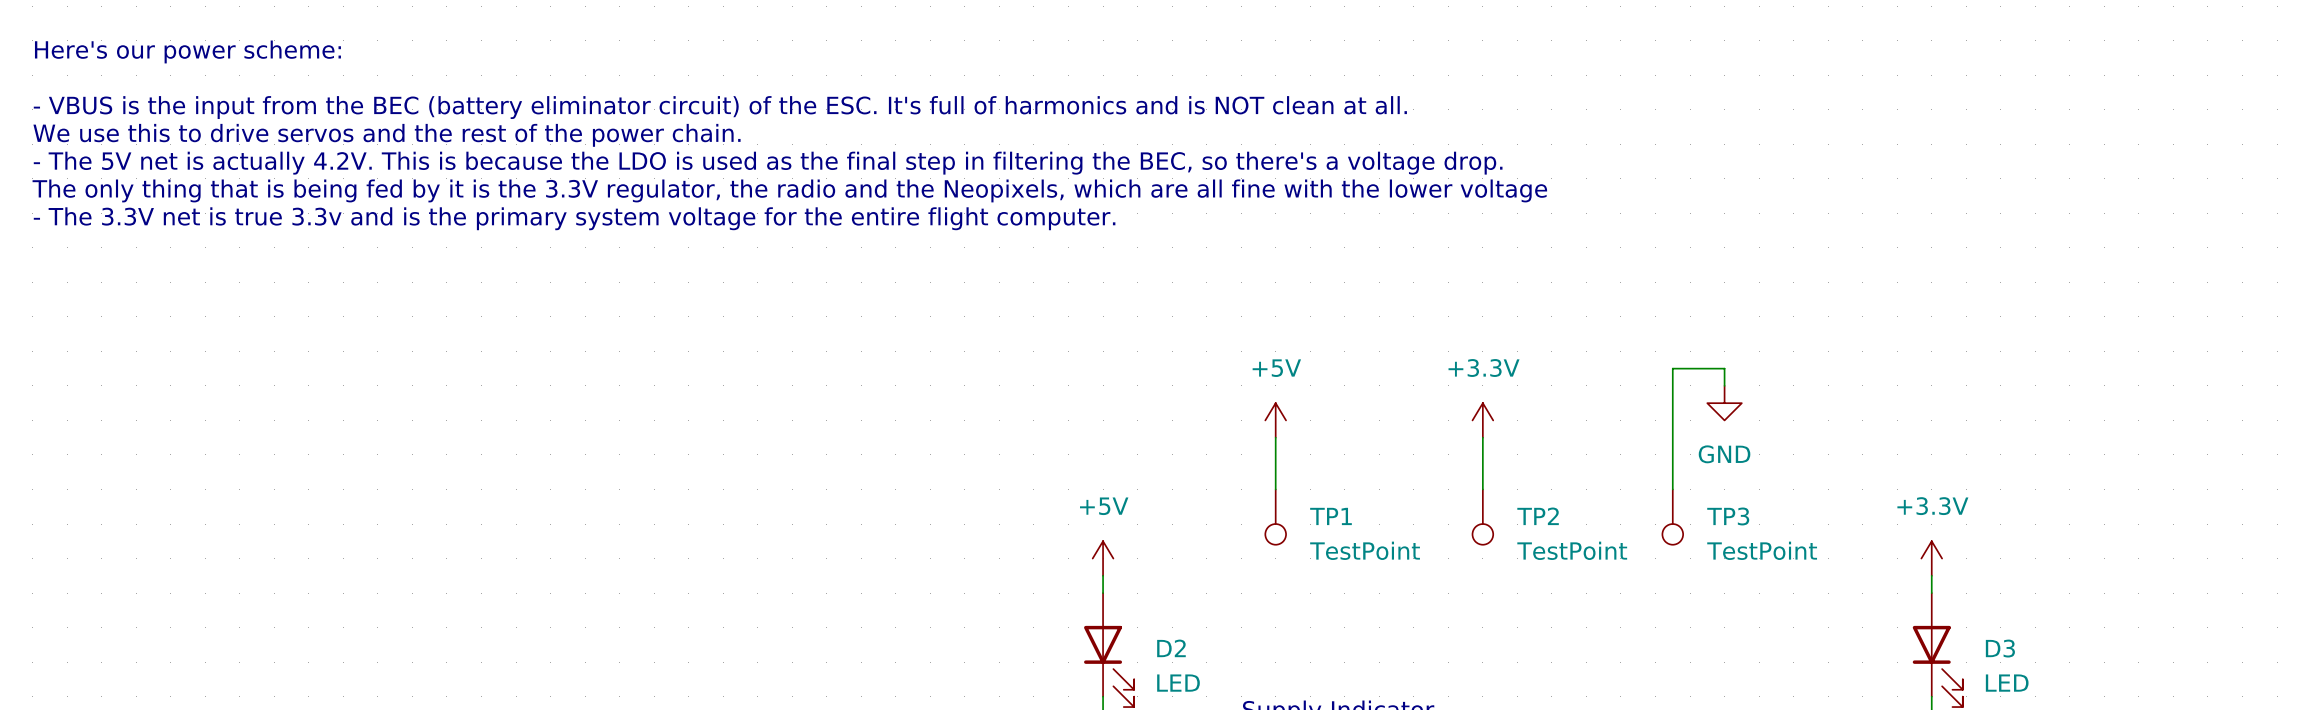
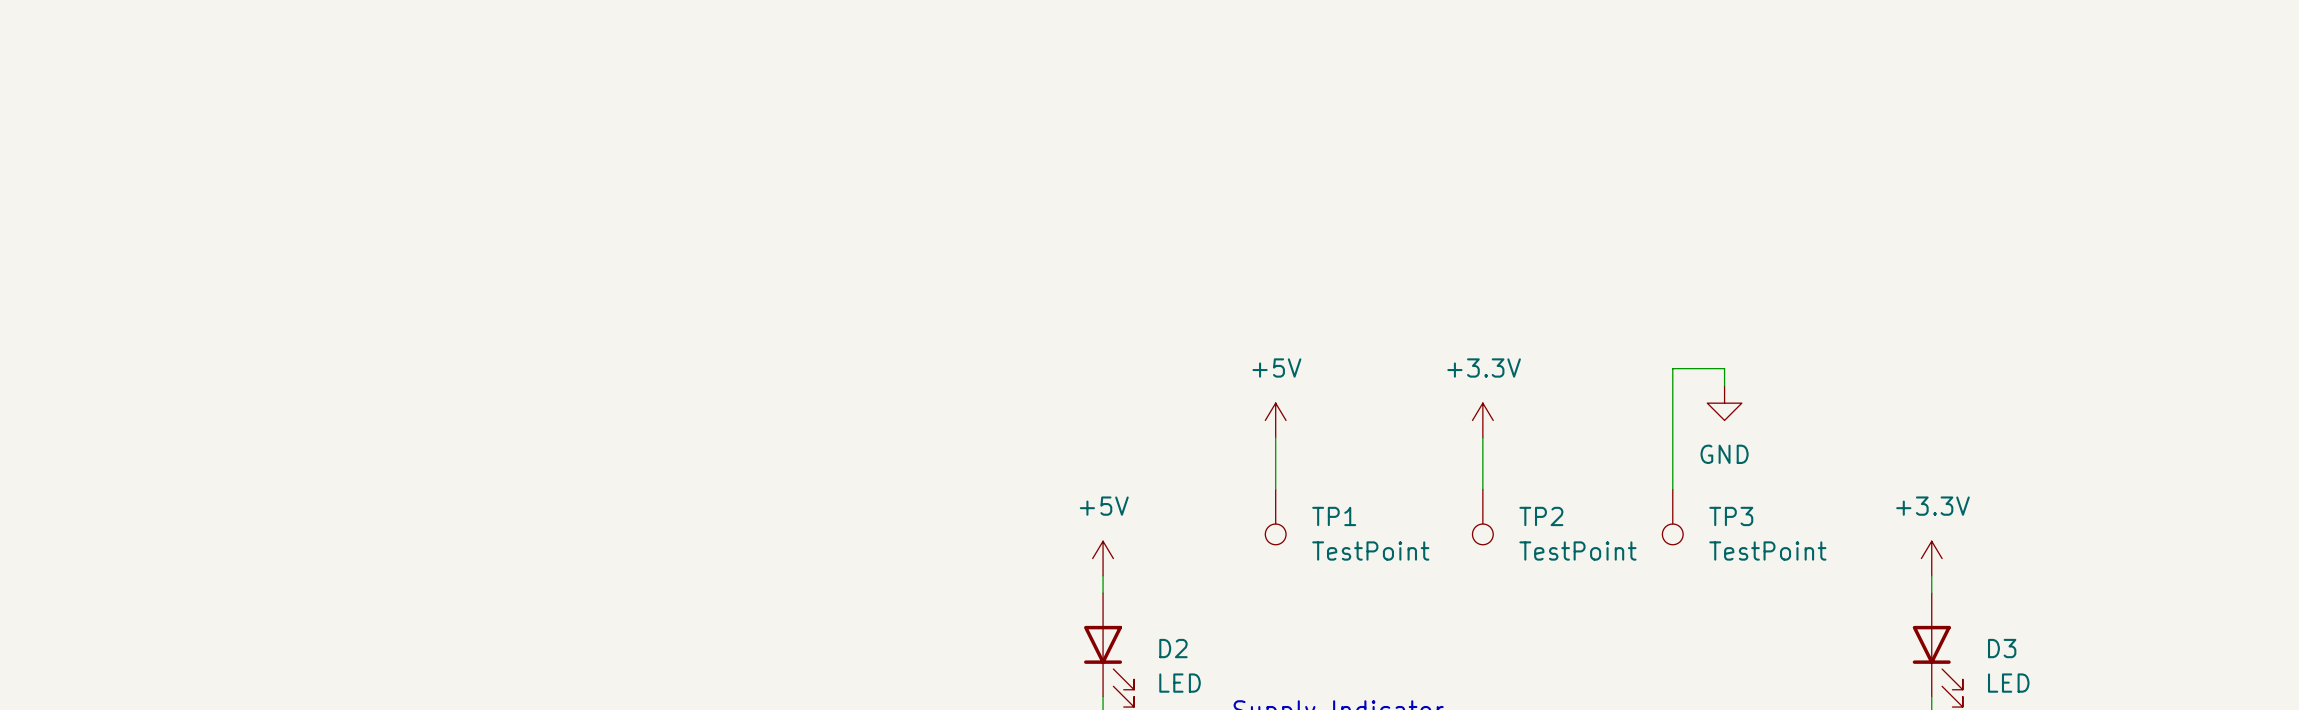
text: Here's our power scheme: (187, 51) -> none
text: - VBUS is the input from the BEC (battery eliminator circuit) of the ESC. It's full of harmonics and is NOT clean at all. (720, 107) -> none
text: We use this to drive servos and the rest of the power chain. (387, 135) -> none
text: - The 5V net is actually 4.2V. This is because the LDO is used as the final step in filtering the BEC, so there's a voltage drop. (768, 163) -> none
text: The only thing that is being fed by it is the 3.3V regulator, the radio and the Neopixels, which are all fine with the lower voltage (789, 190) -> none
text: - The 3.3V net is true 3.3v and is the primary system voltage for the entire flight computer. (574, 218) -> none

